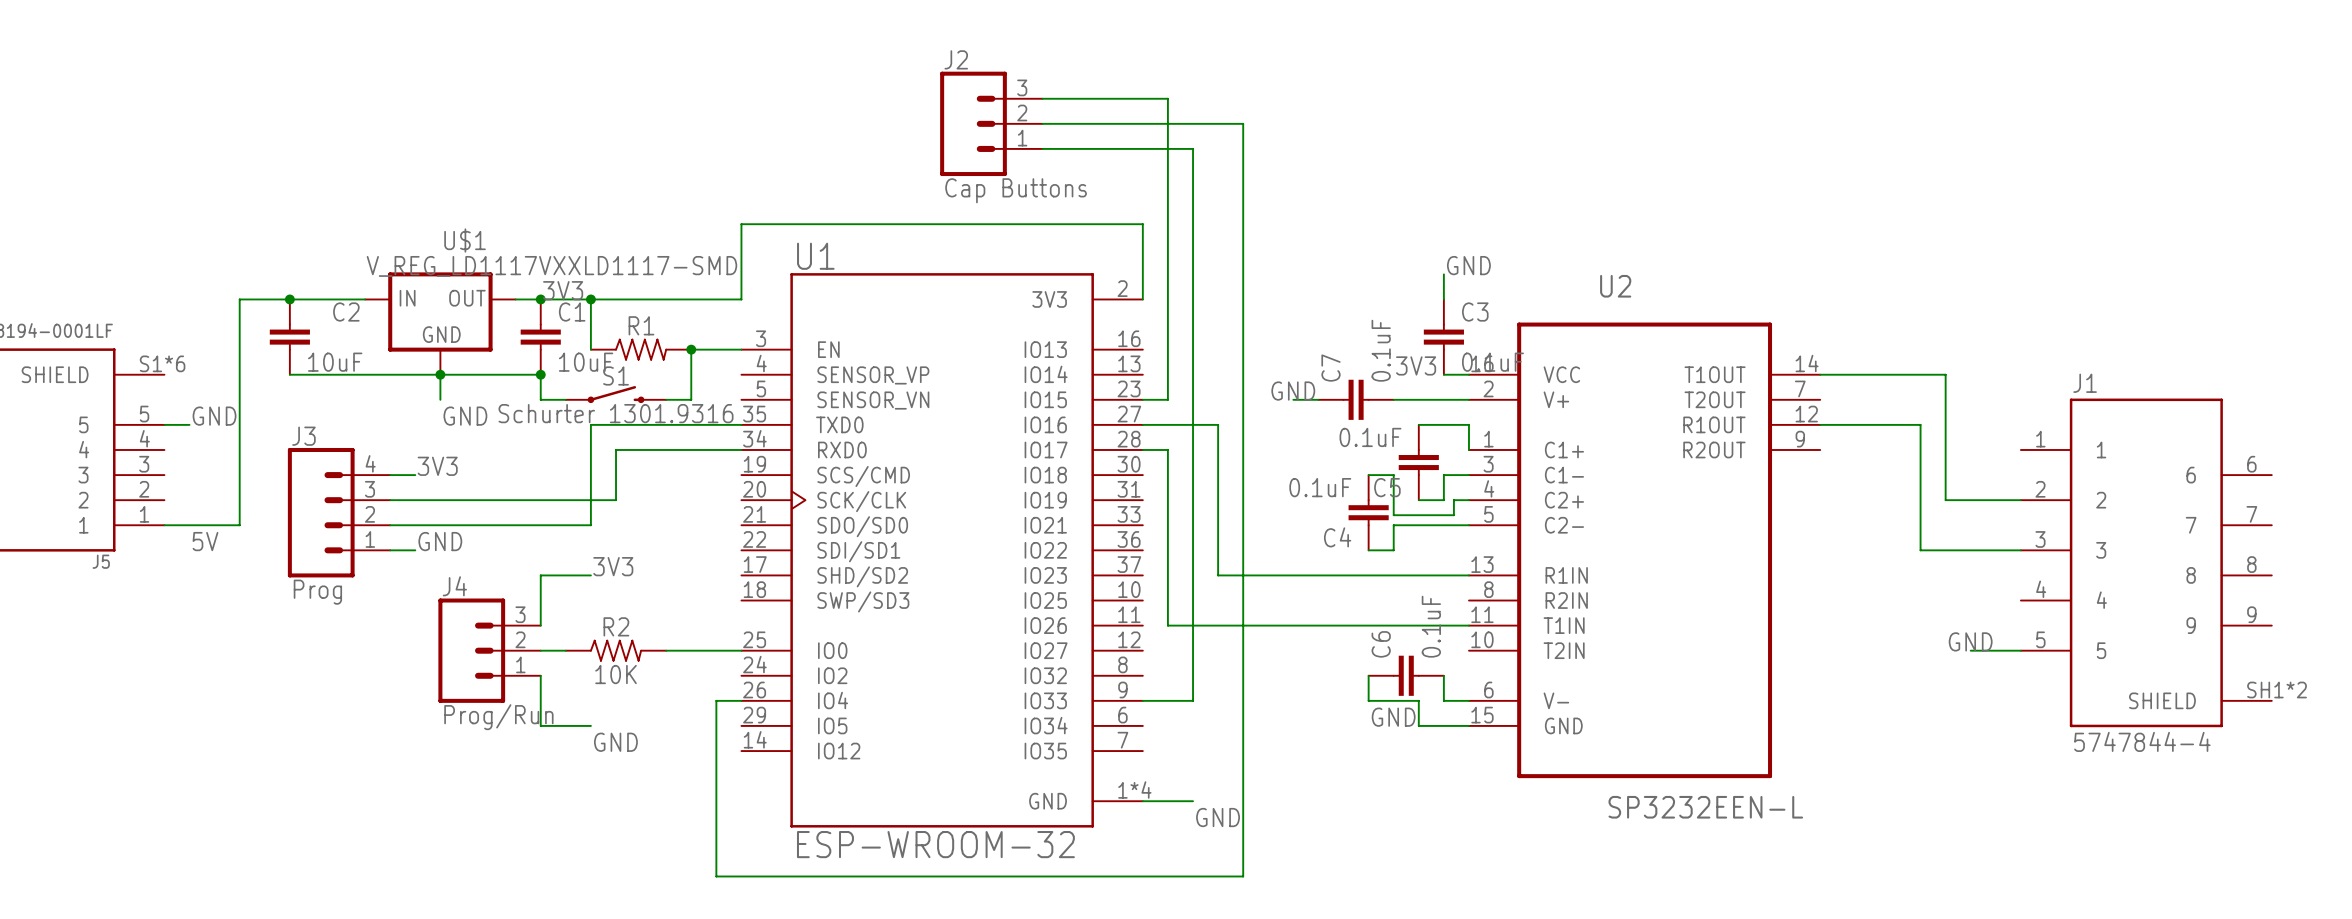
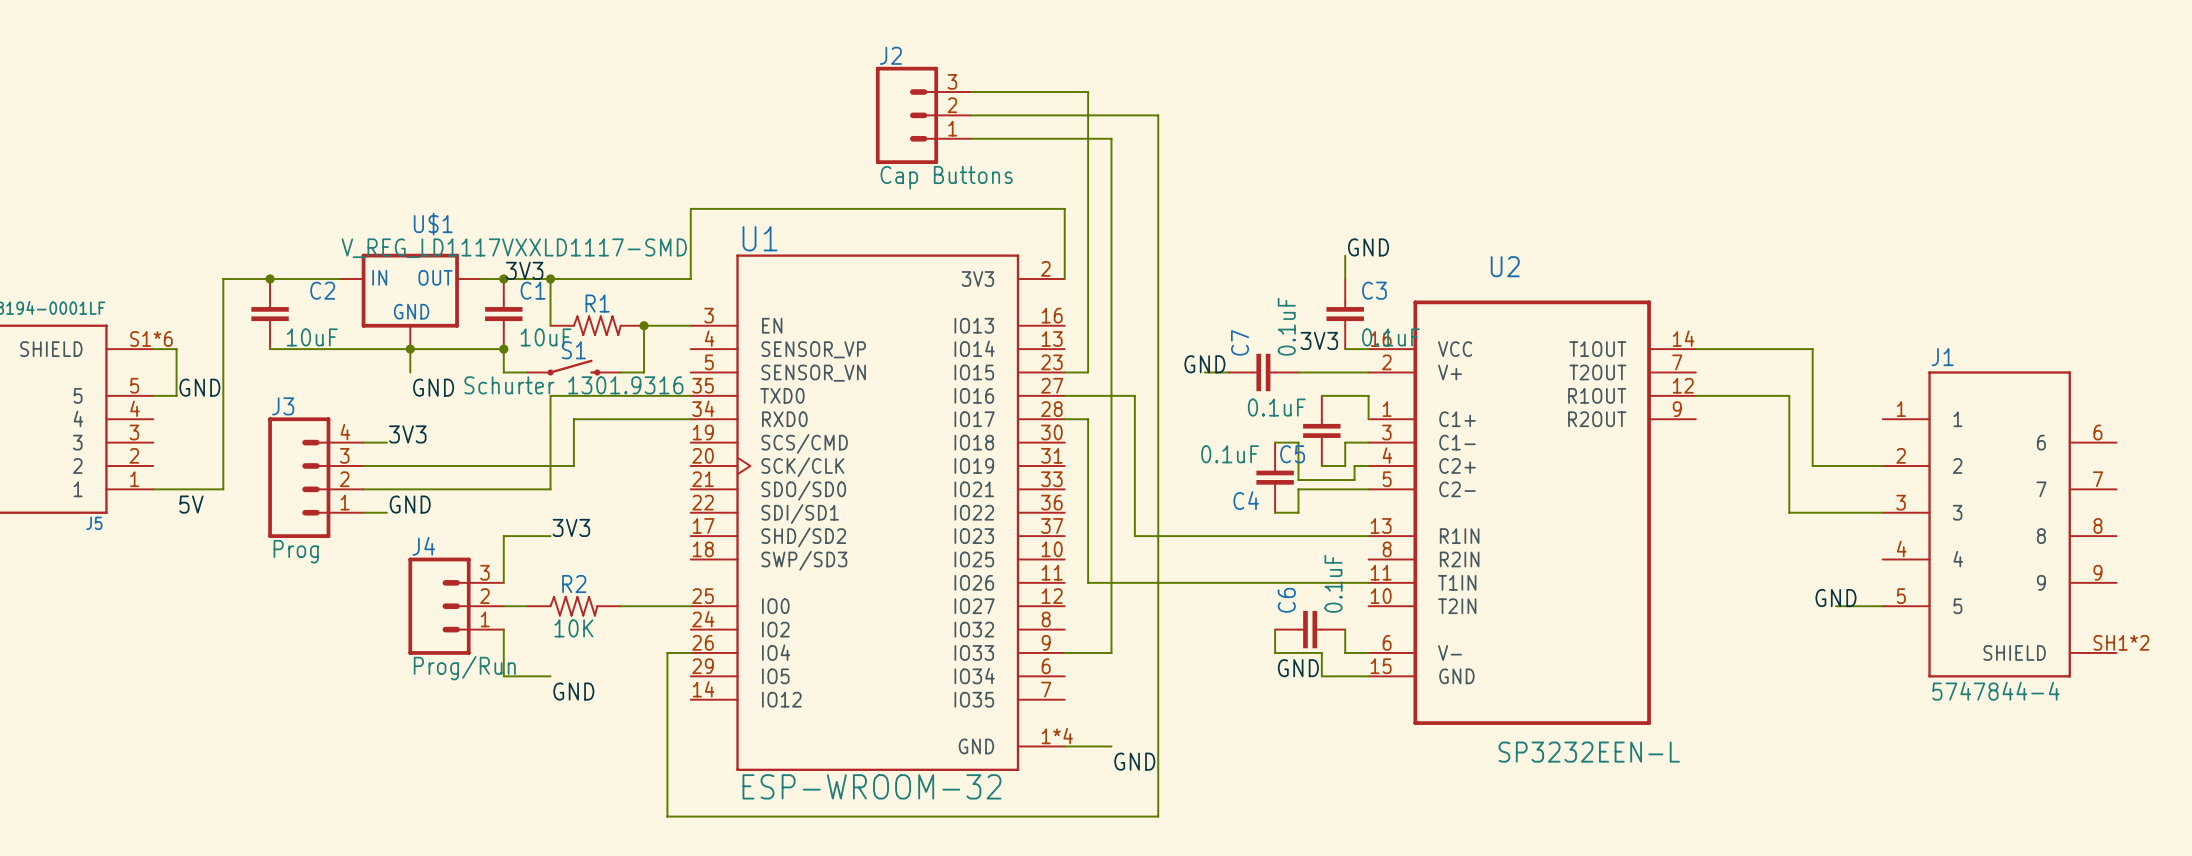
wire: none -> (153, 349) (176, 349) (176, 395)

